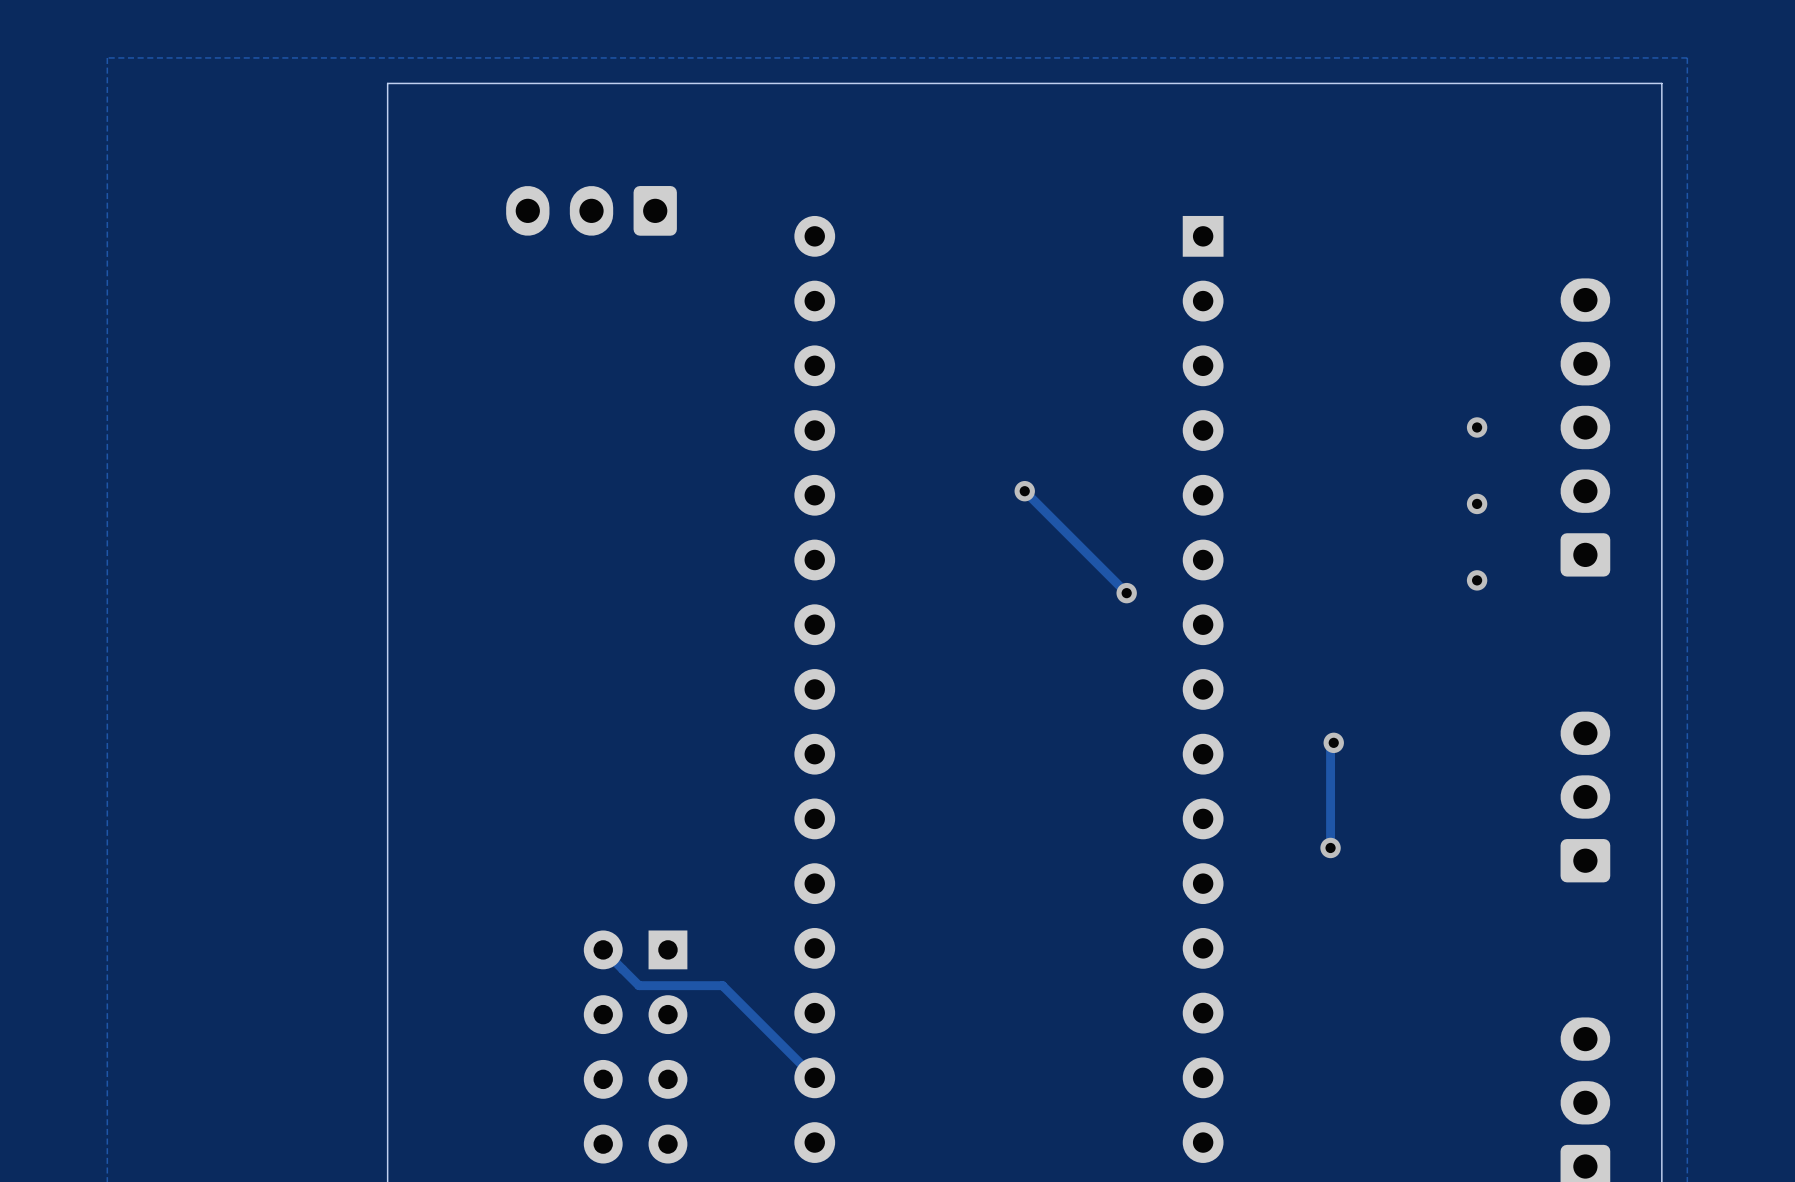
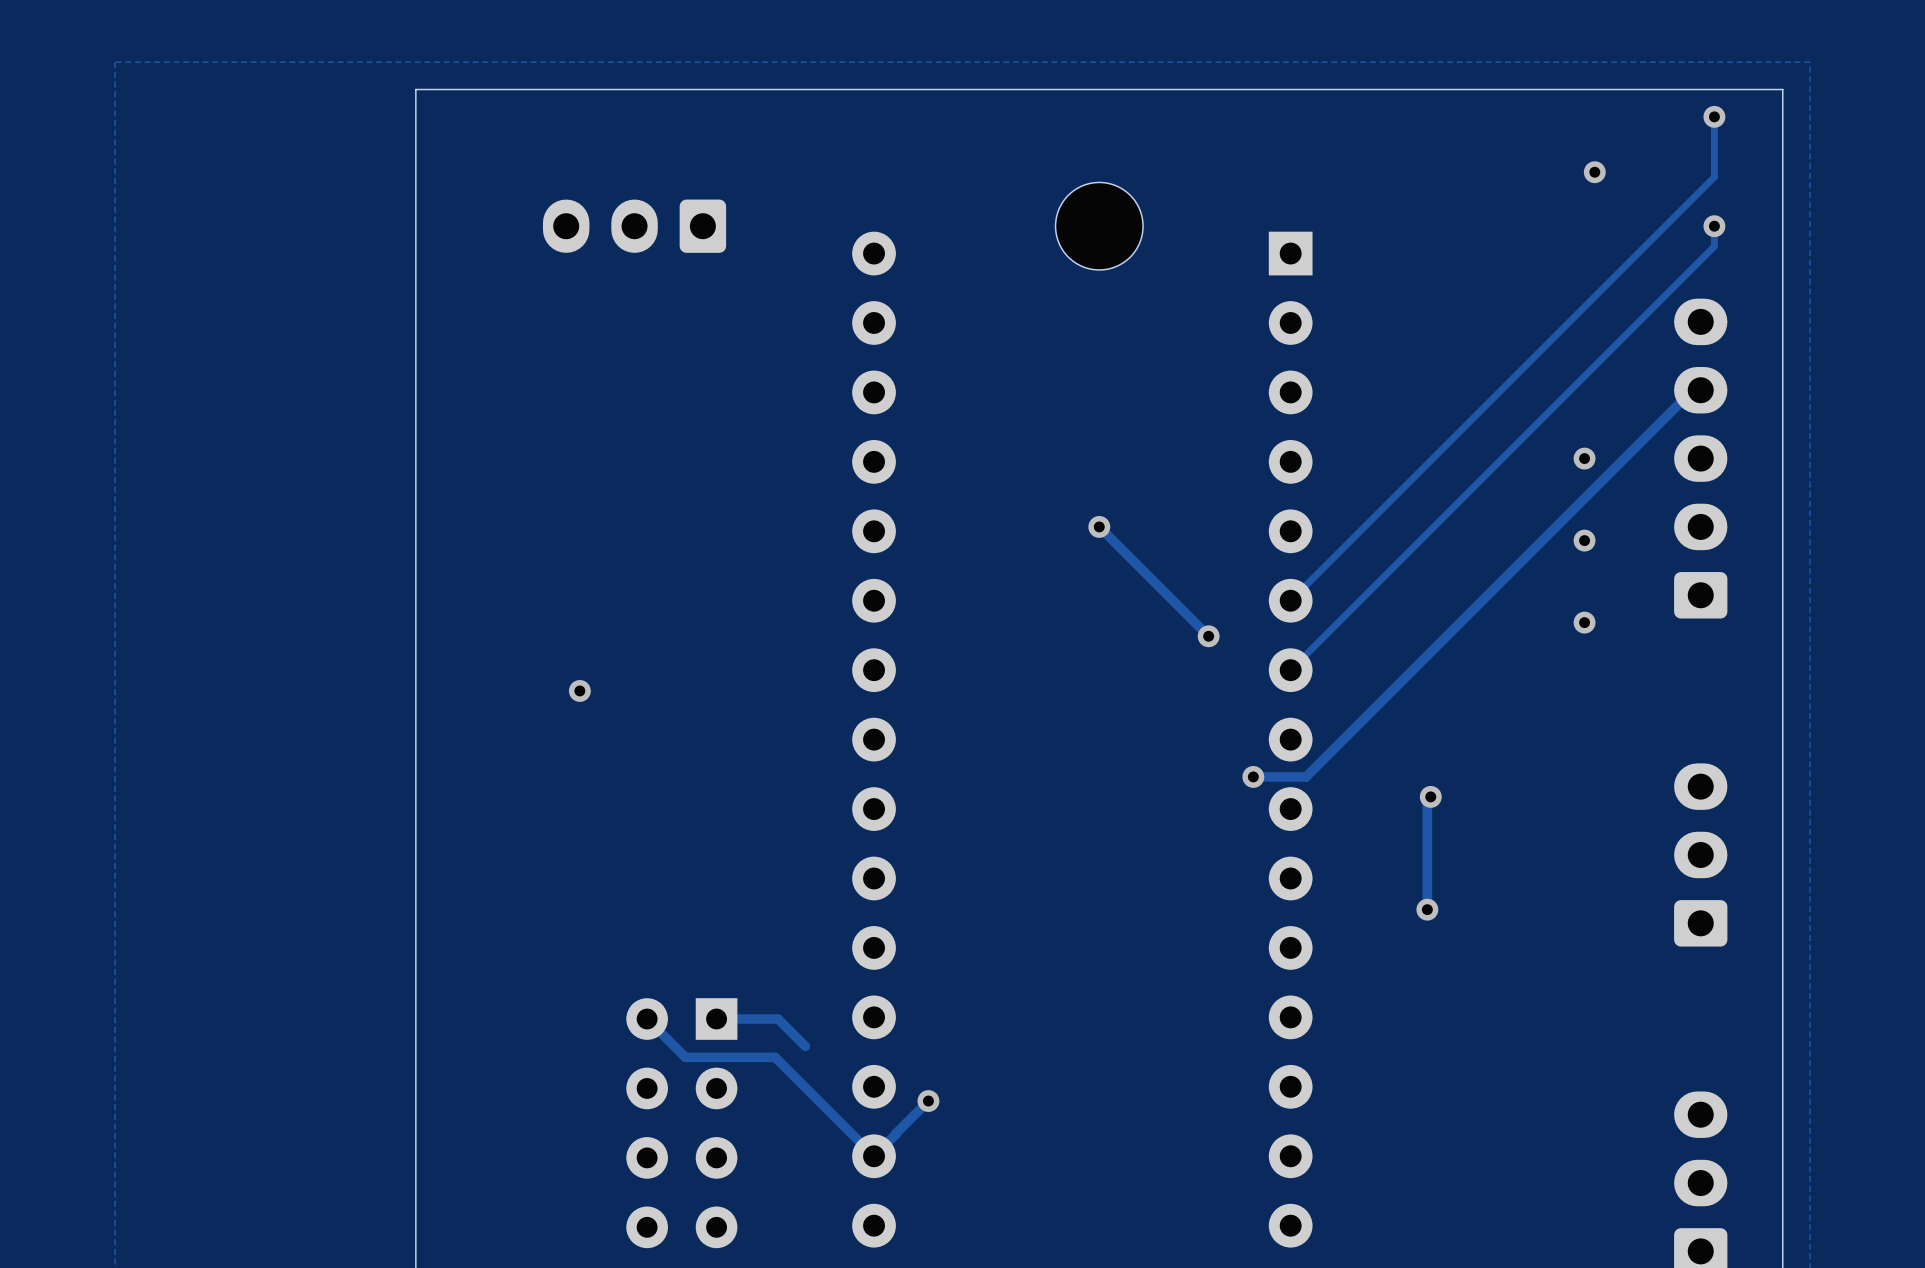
track: none -> (1714, 116) (1714, 177) (1290, 600)
via: none -> (1714, 116)
via: none -> (1594, 172)
part: none -> (1099, 226)
track: none -> (1714, 226) (1714, 246) (1290, 670)
via: none -> (1714, 226)
track: none -> (1700, 390) (1692, 390) (1306, 776) (1253, 776)
via: none -> (579, 690)
via: none -> (1253, 776)
track: none -> (716, 1019) (778, 1019) (805, 1046)
track: none -> (928, 1101) (874, 1156)
via: none -> (928, 1101)

